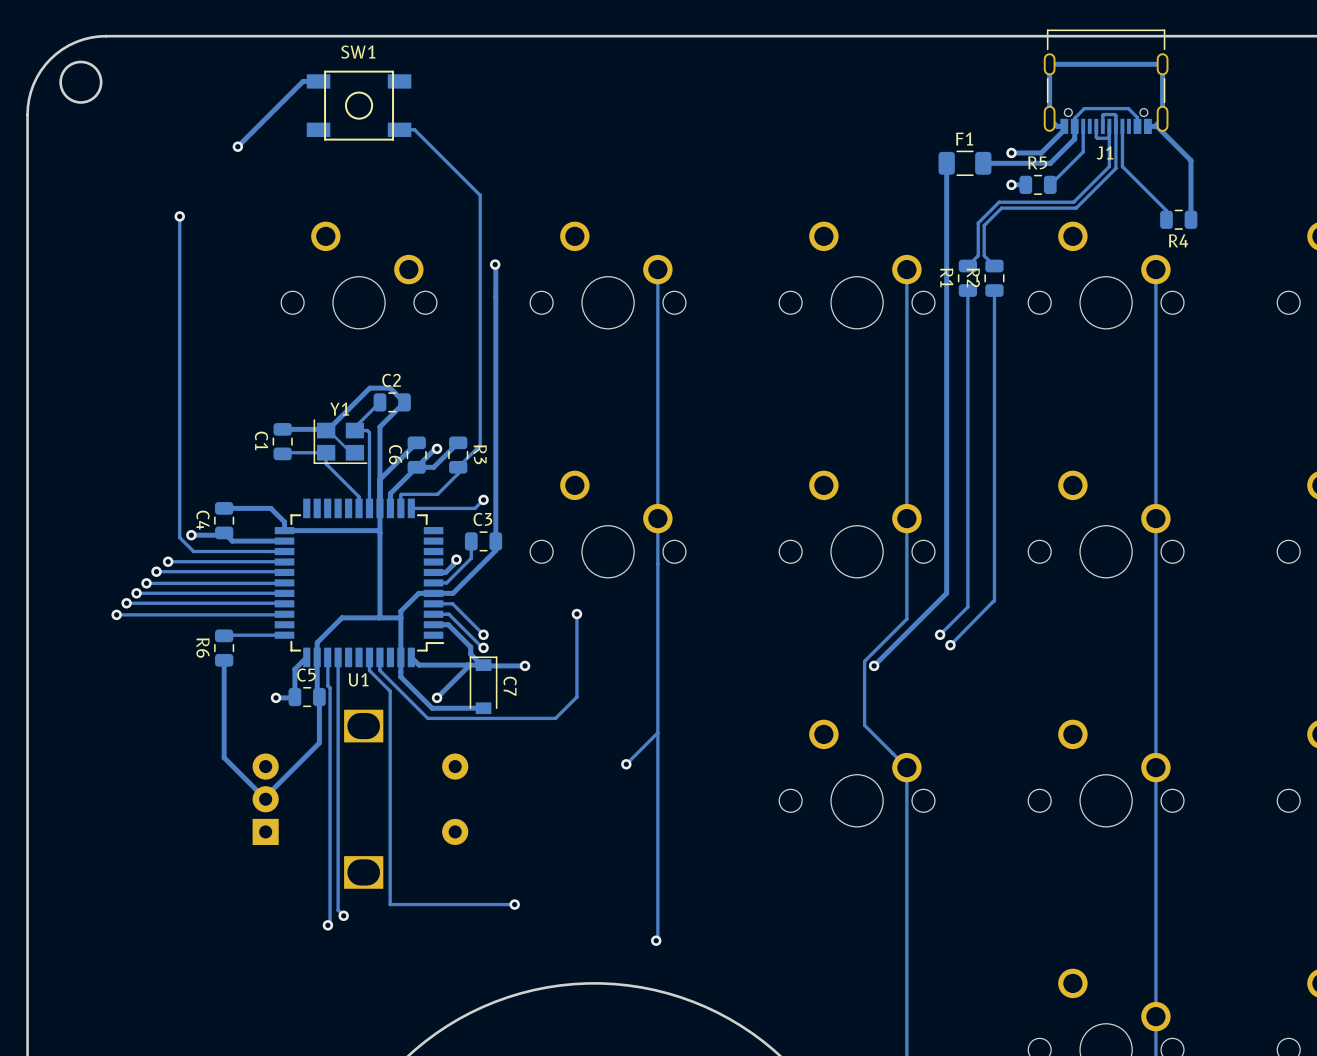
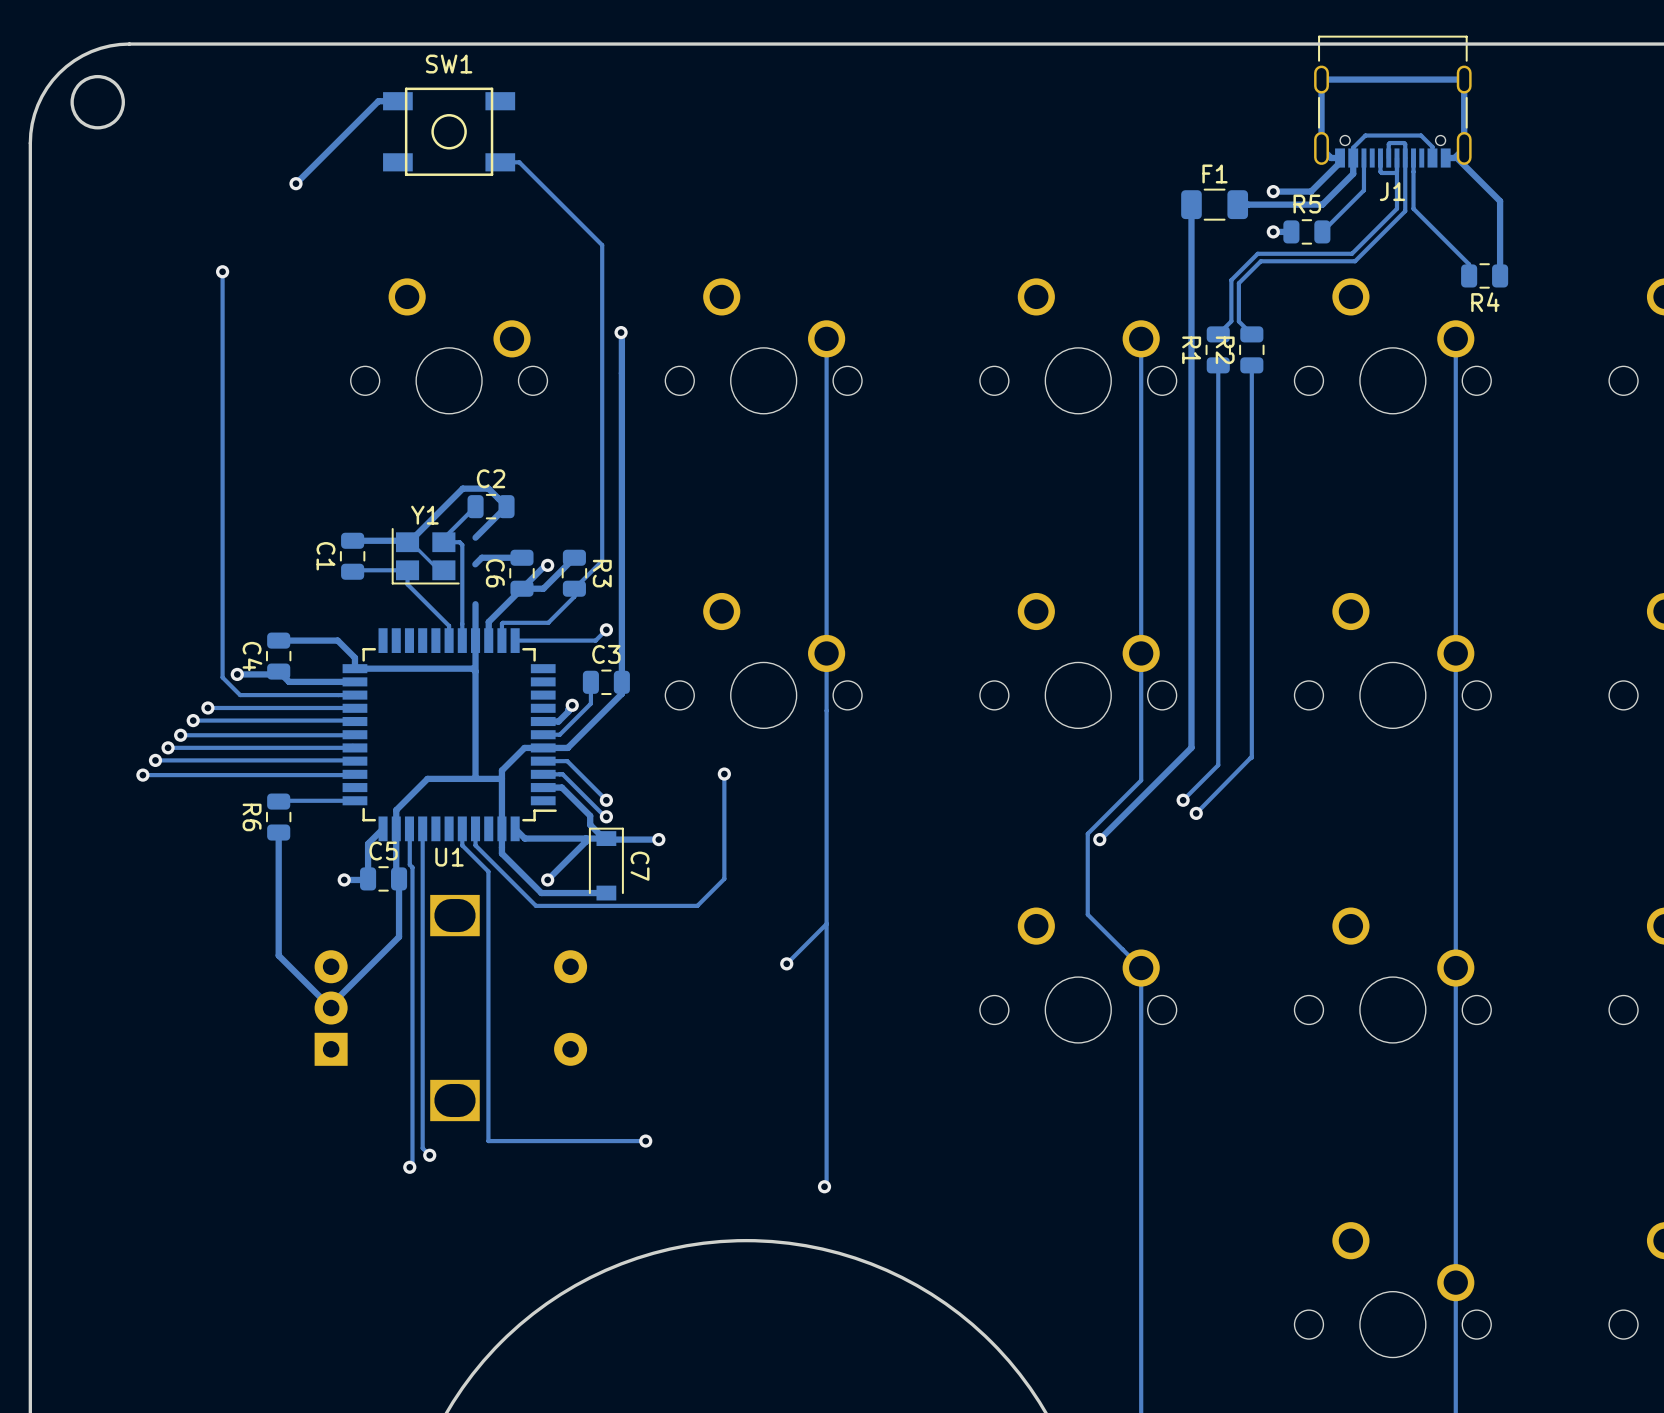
track: (379, 426) (379, 479) (416, 442) -> (475, 564) (481, 557) (521, 557)

